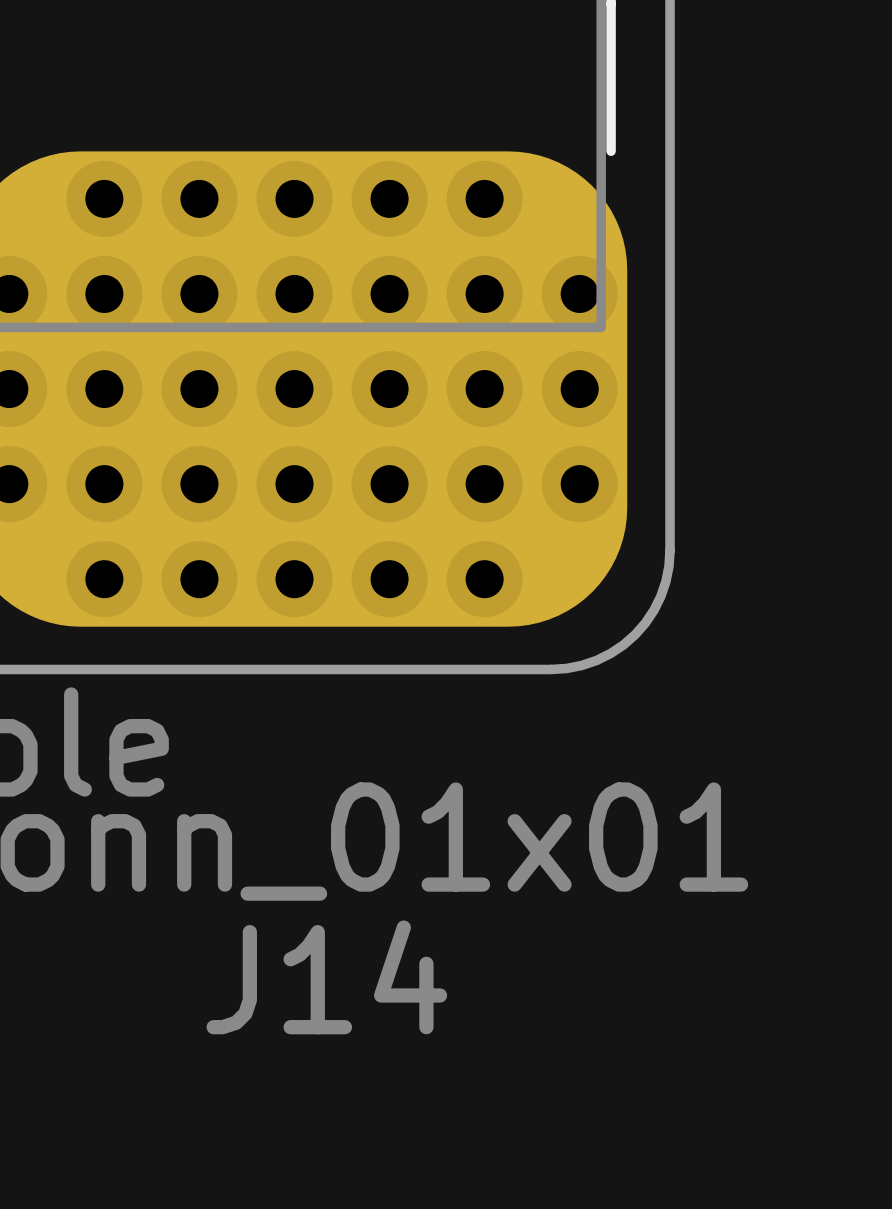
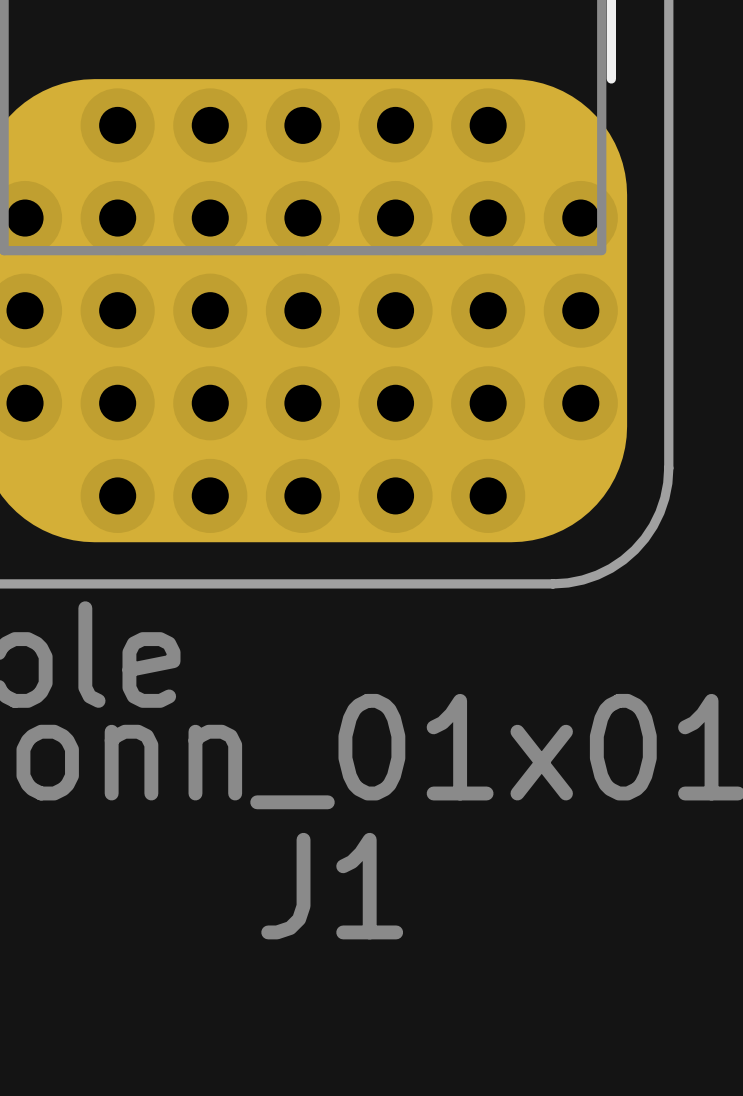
J14 name: J14 (326, 977) -> J1 (332, 886)

